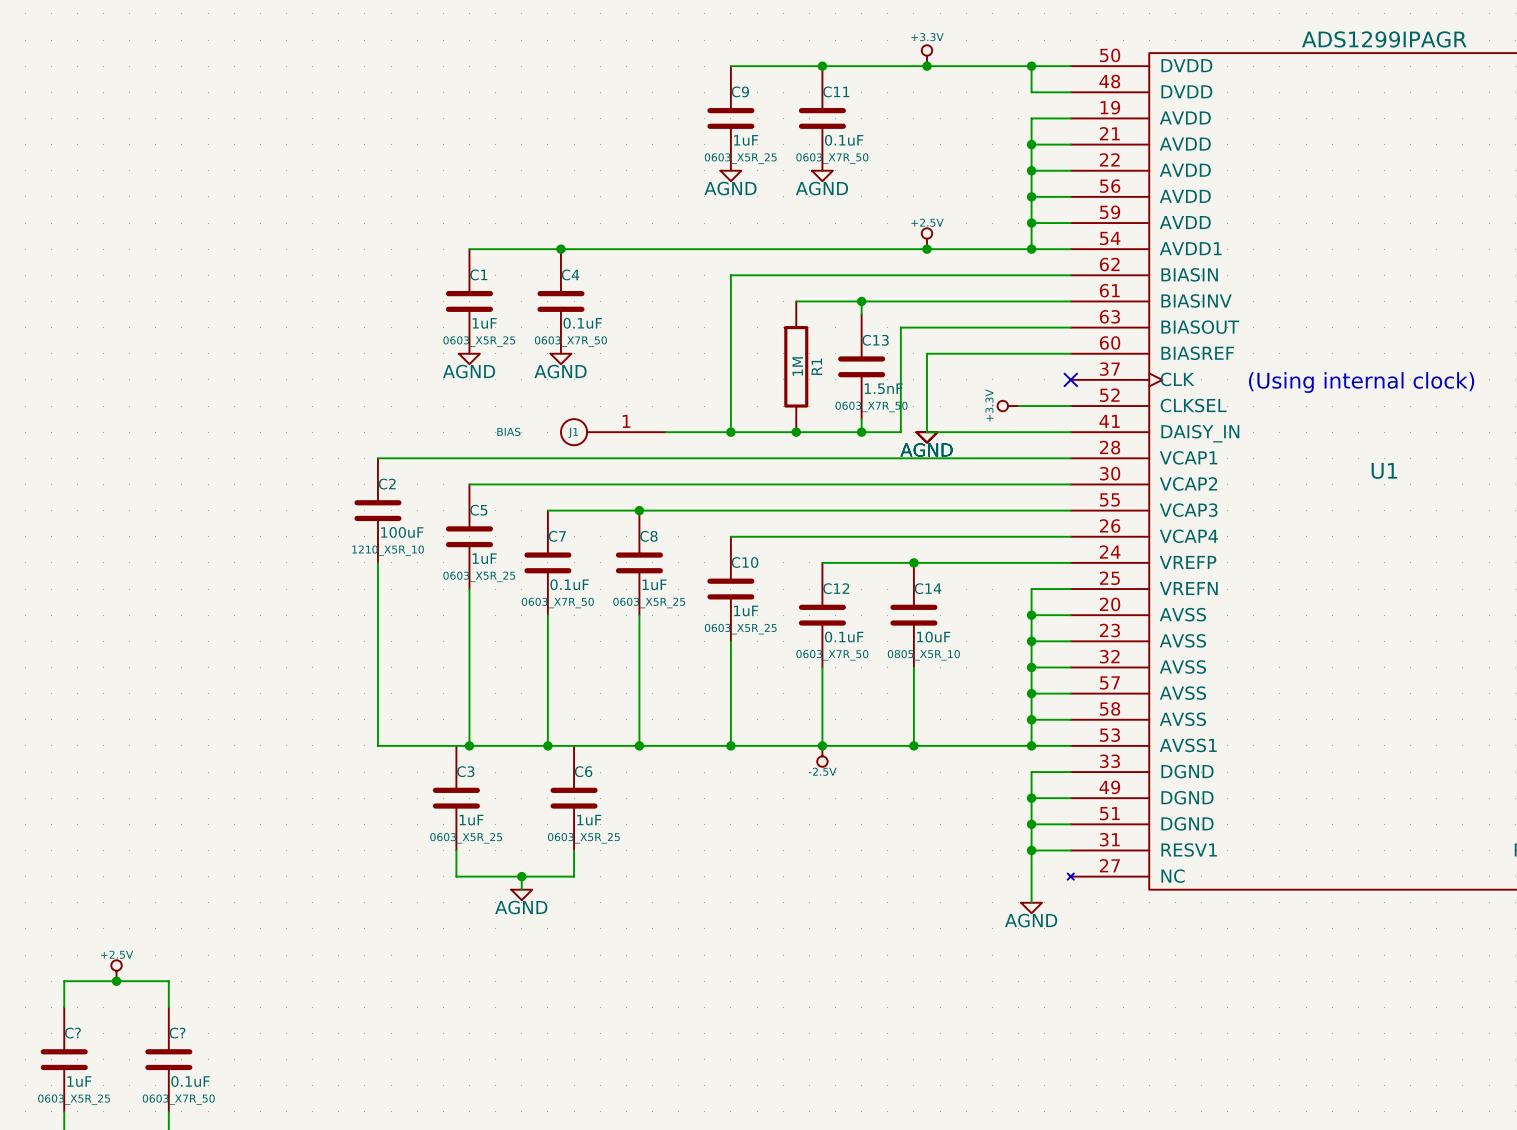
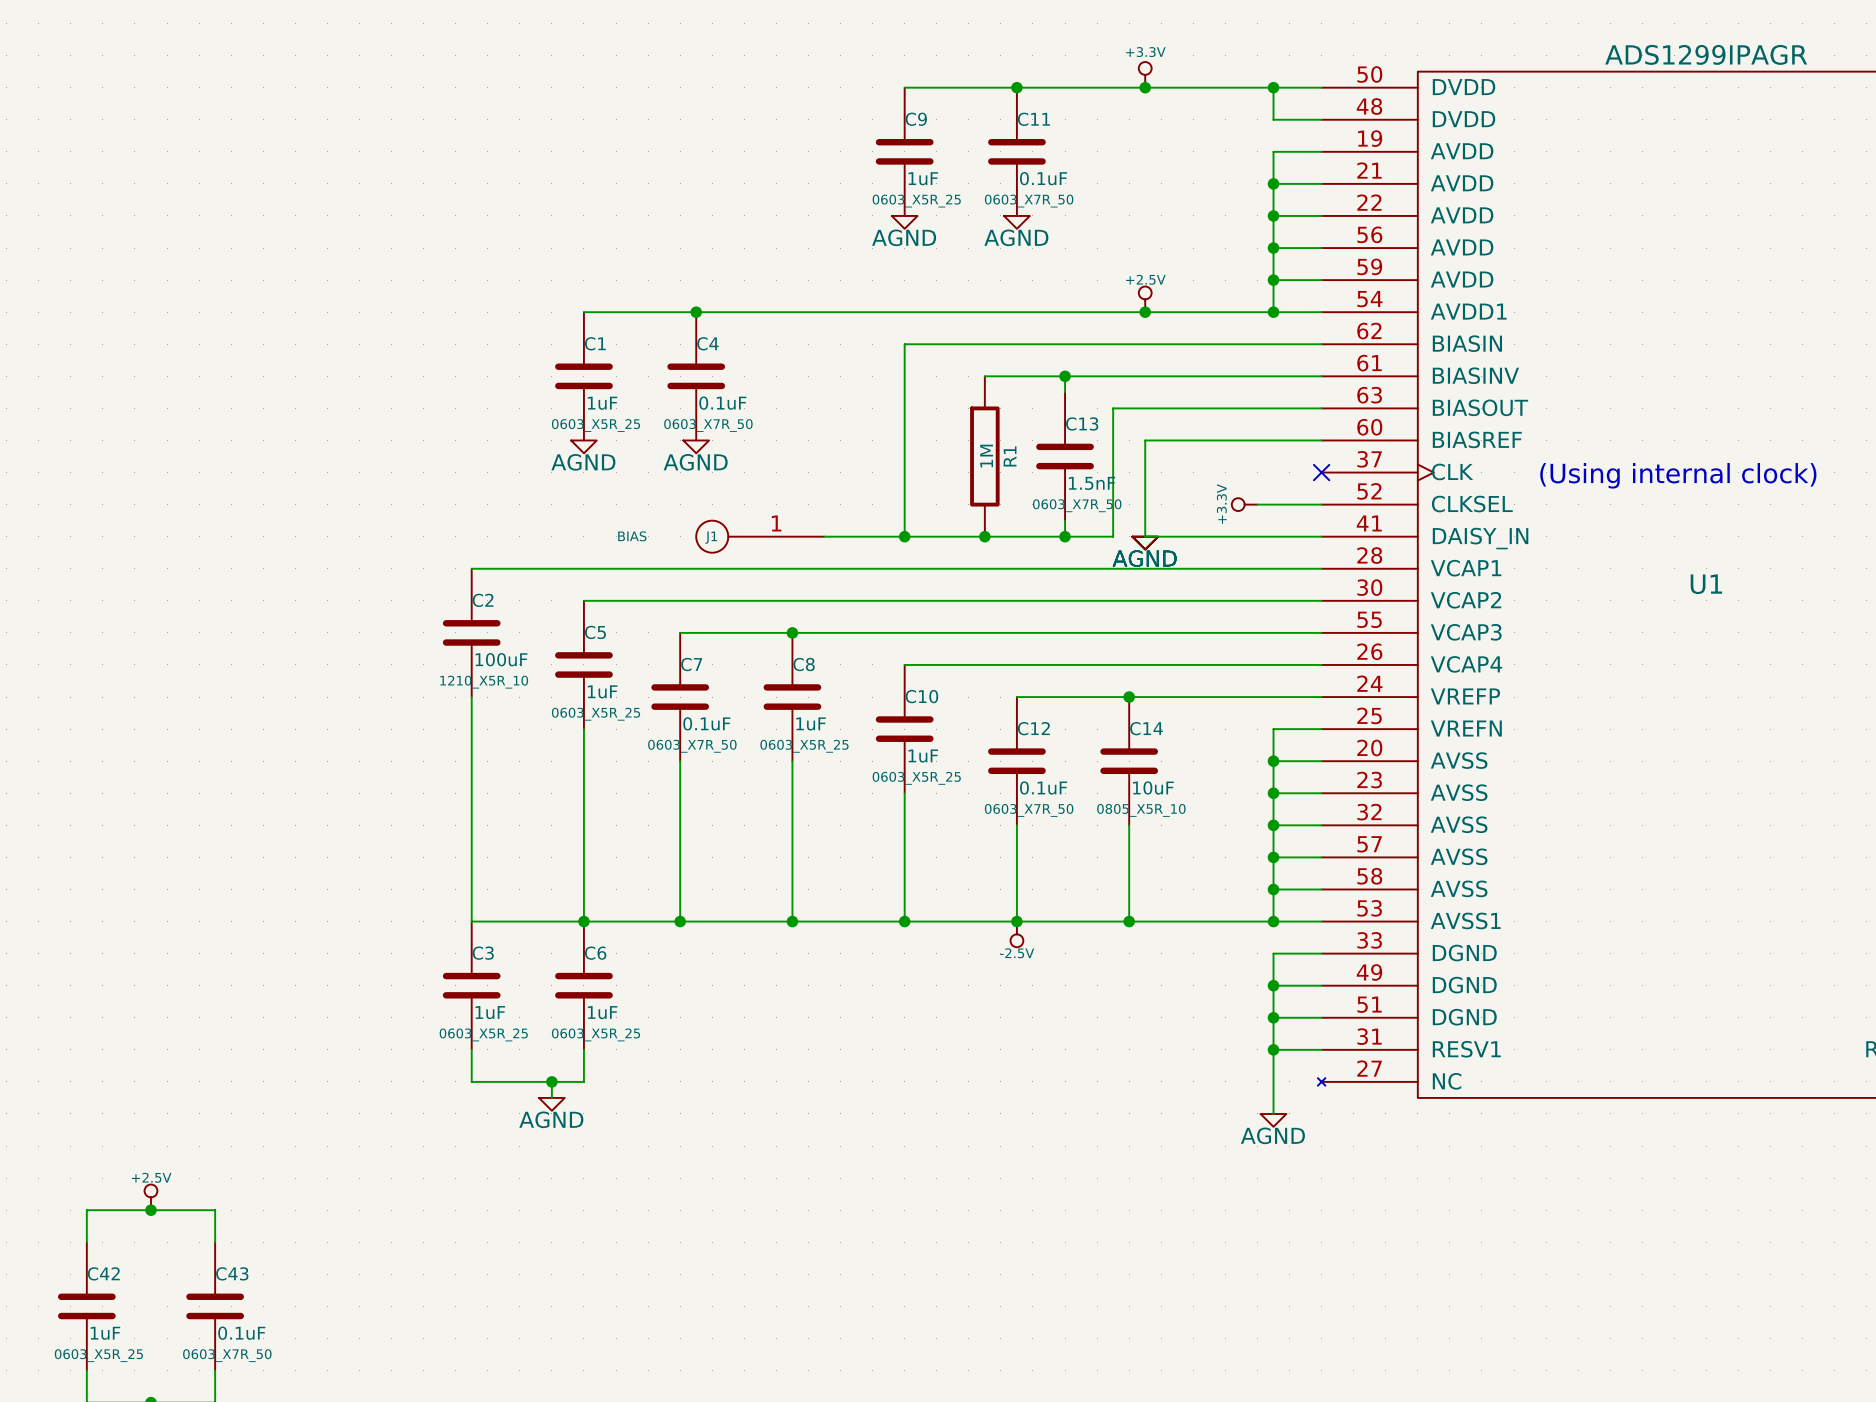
C3 position: (456, 798) -> (471, 985)
C6 position: (574, 798) -> (583, 985)
wire: (456, 850) (456, 876) -> (471, 1049) (471, 1081) (567, 1081)
wire: (574, 850) (574, 876) (469, 876) -> (583, 1049) (583, 1081)
junction: none -> (551, 1081)
wire: (521, 876) (521, 889) -> (551, 1081) (551, 1097)
junction: (521, 876) -> none
power symbol position: AGND (521, 894) -> AGND (551, 1104)
C? name: C? (72, 1033) -> C42 (103, 1273)
C? name: C? (177, 1033) -> C43 (232, 1273)

